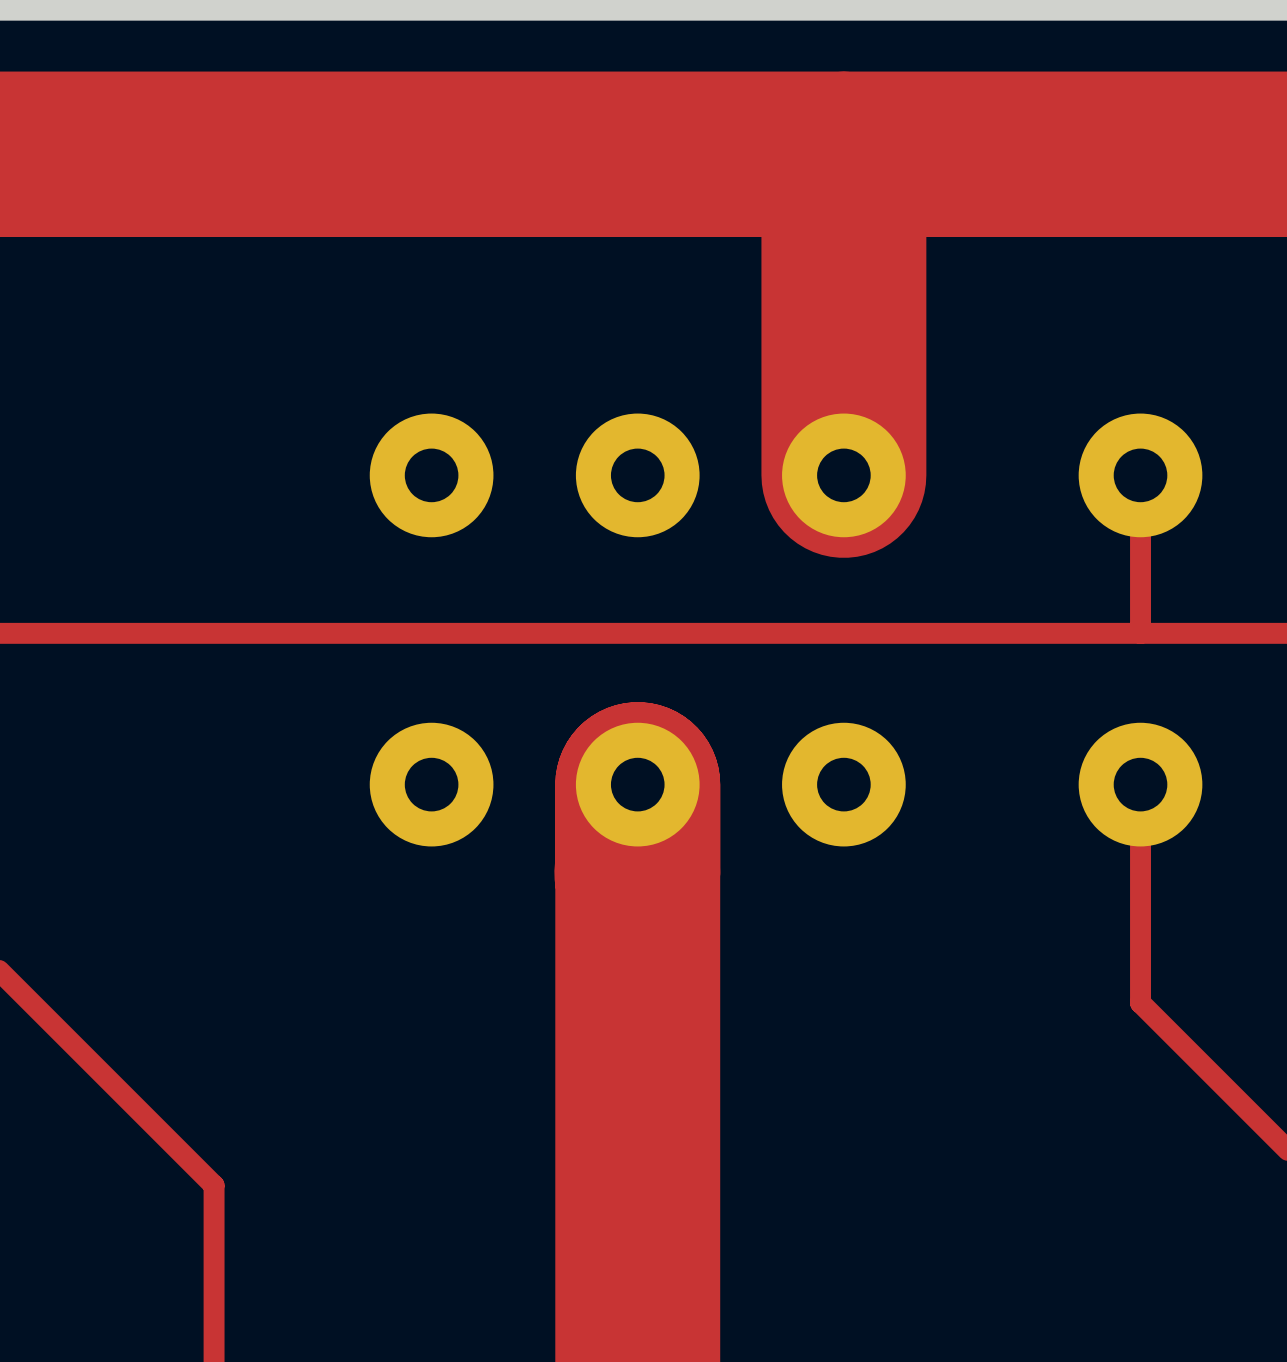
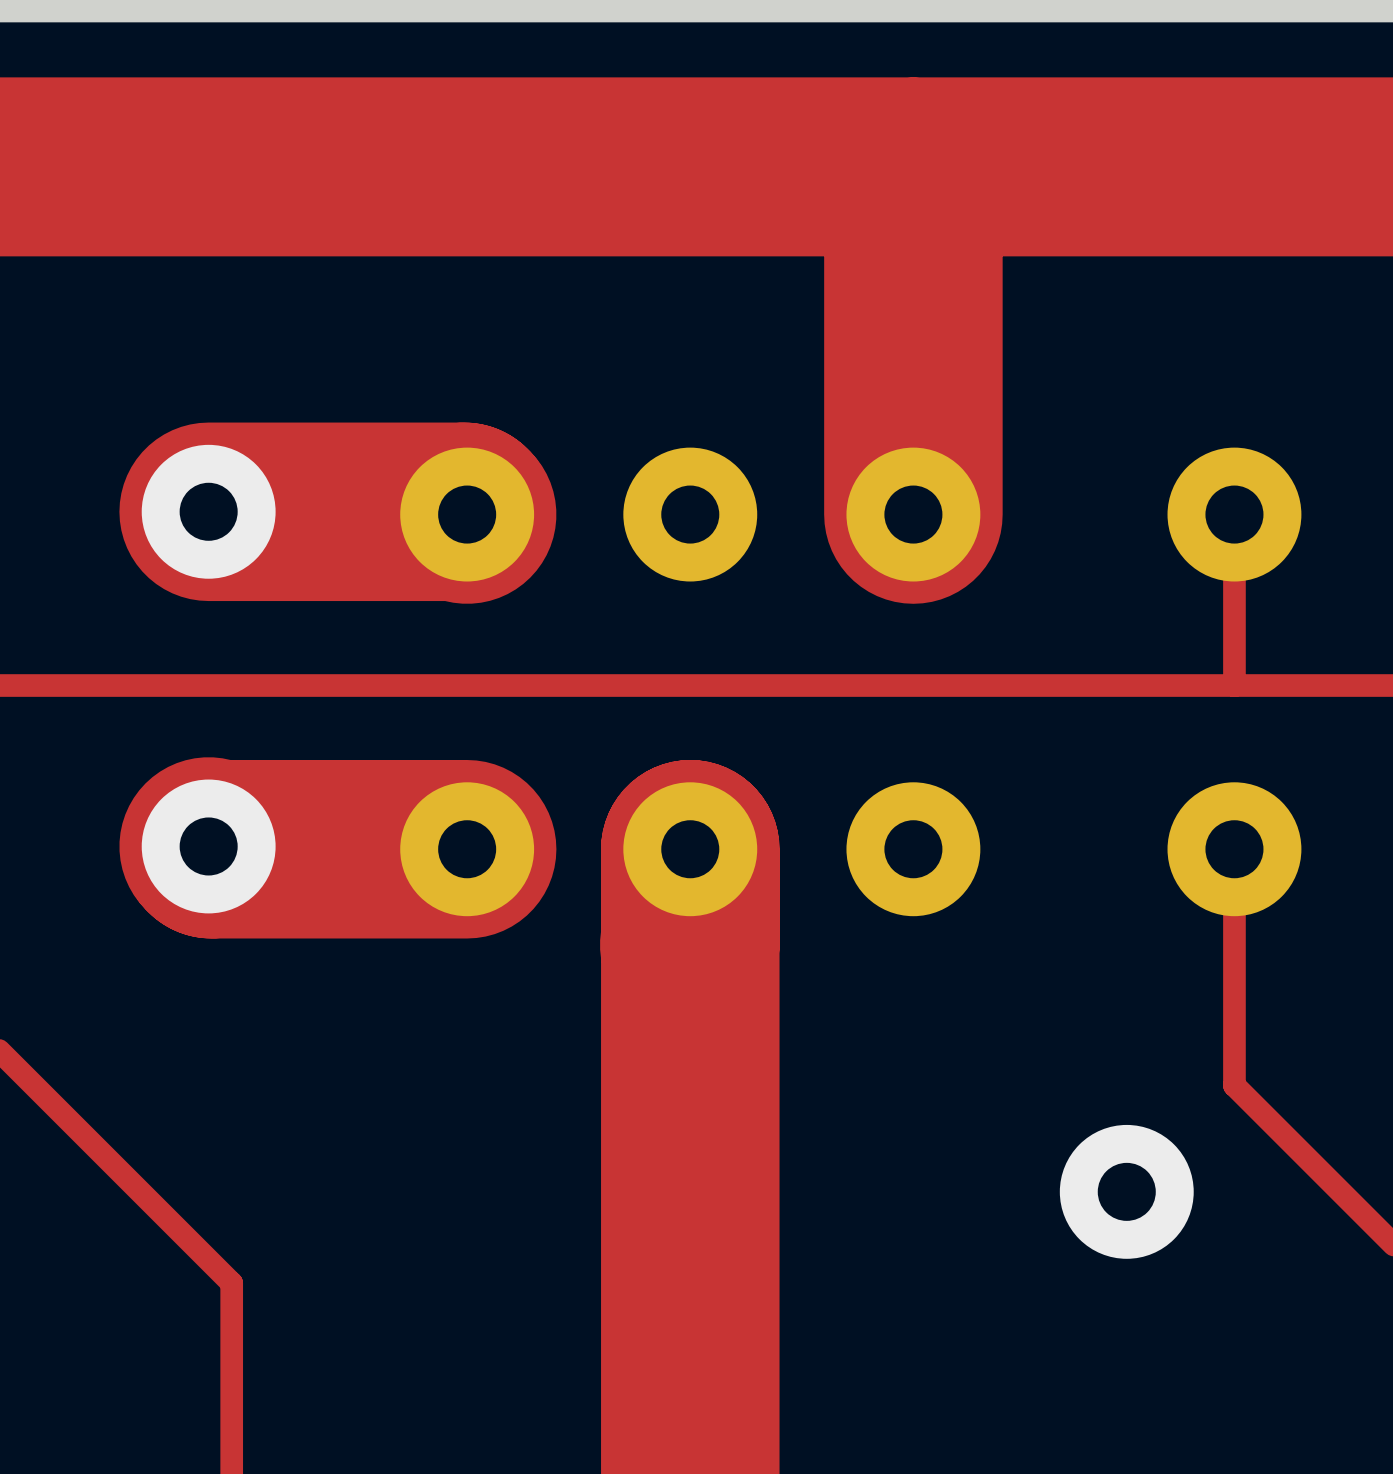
track: none -> (208, 511) (464, 511) (467, 514)
via: none -> (208, 511)
track: none -> (208, 846) (211, 849) (467, 849)
via: none -> (208, 846)
via: none -> (1126, 1191)

